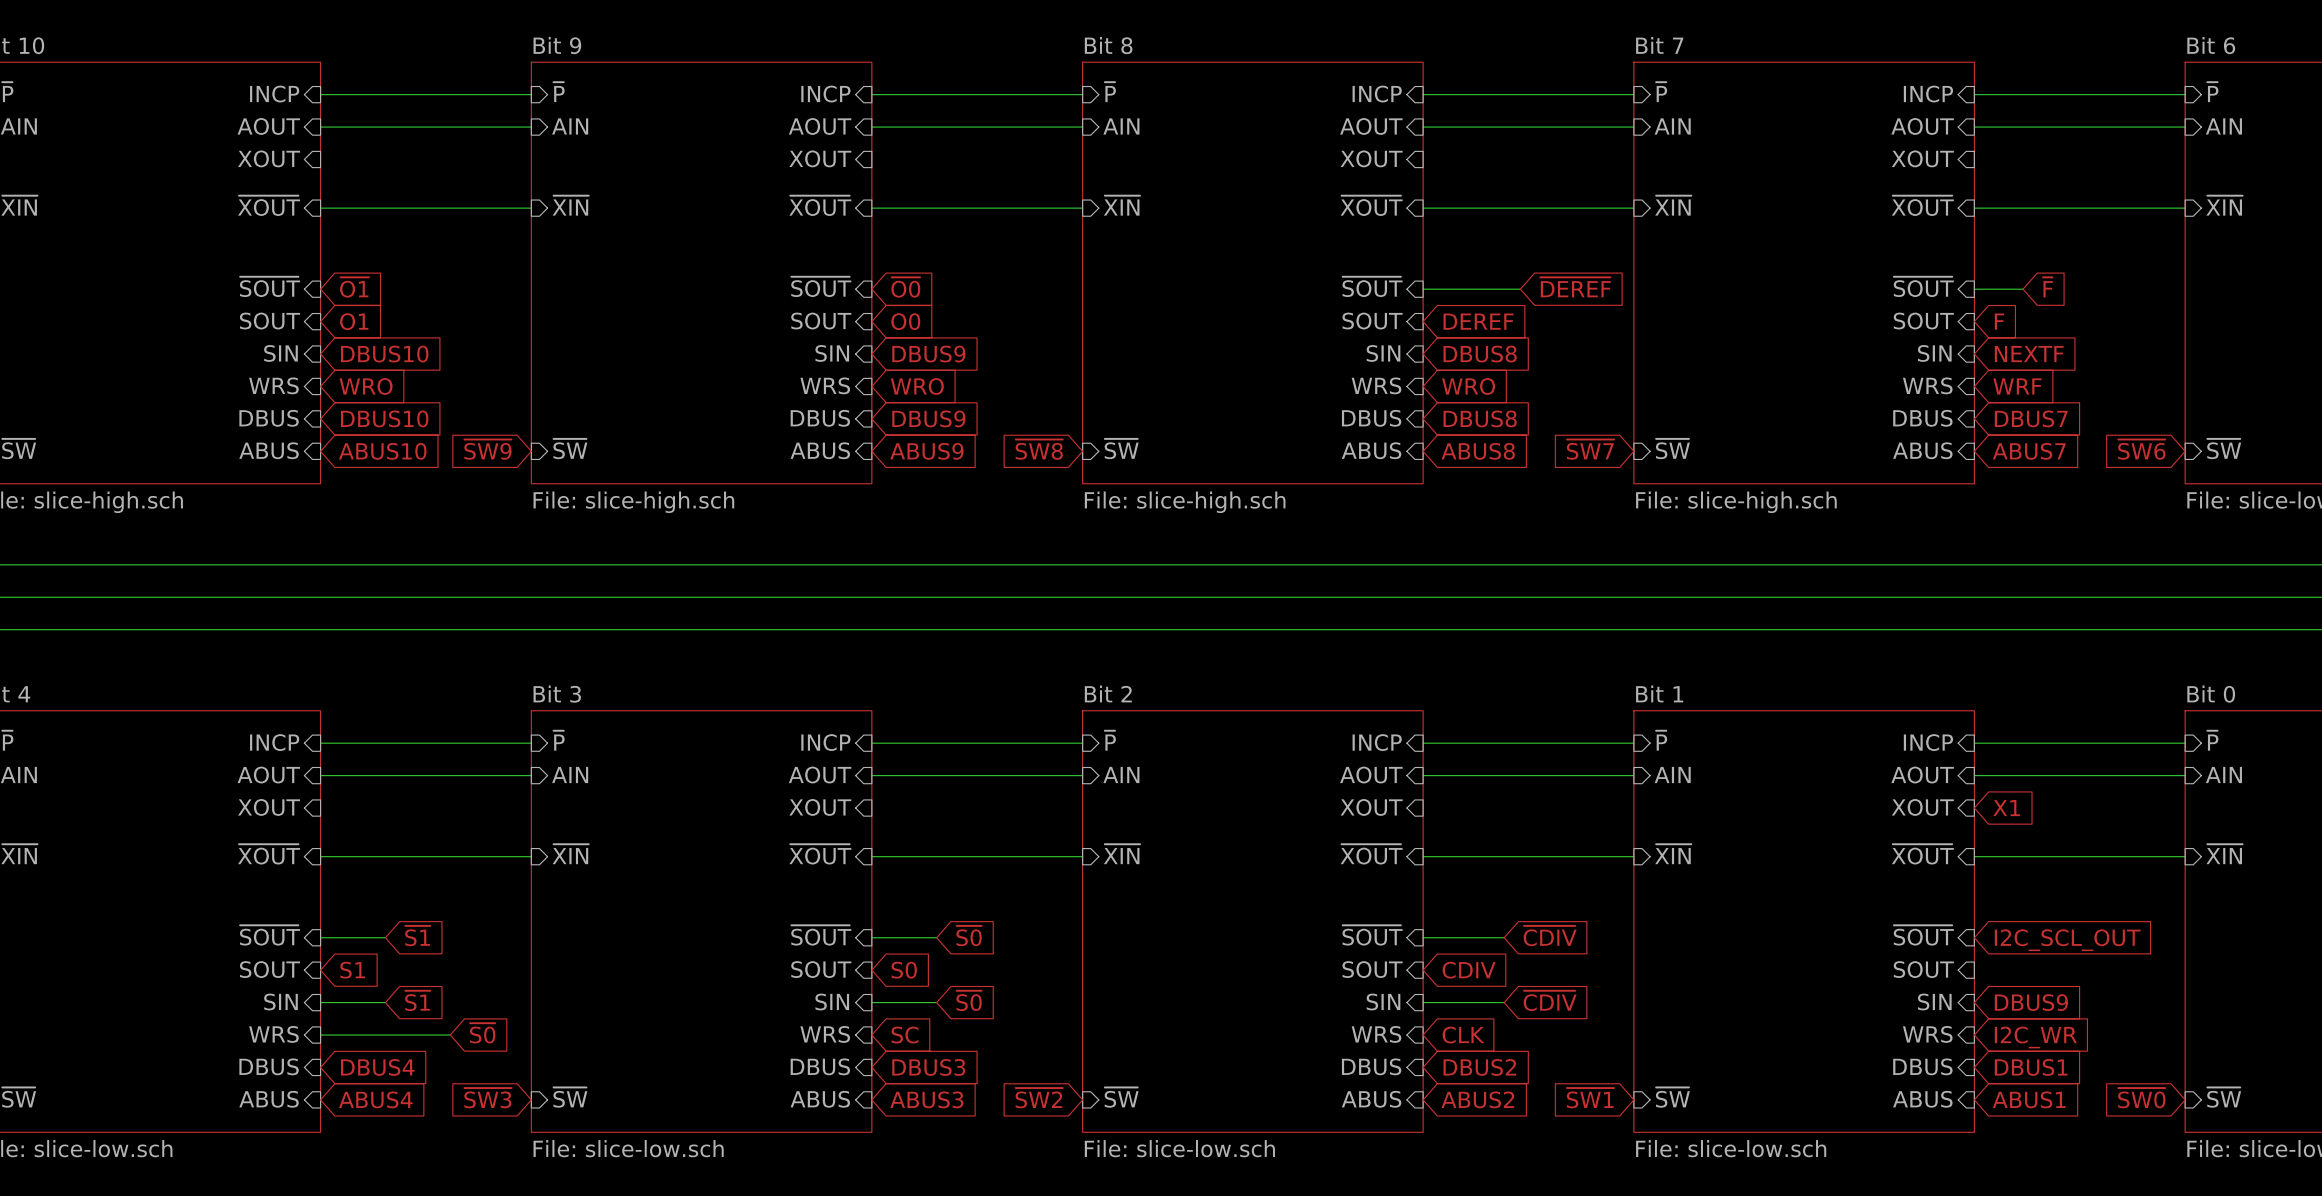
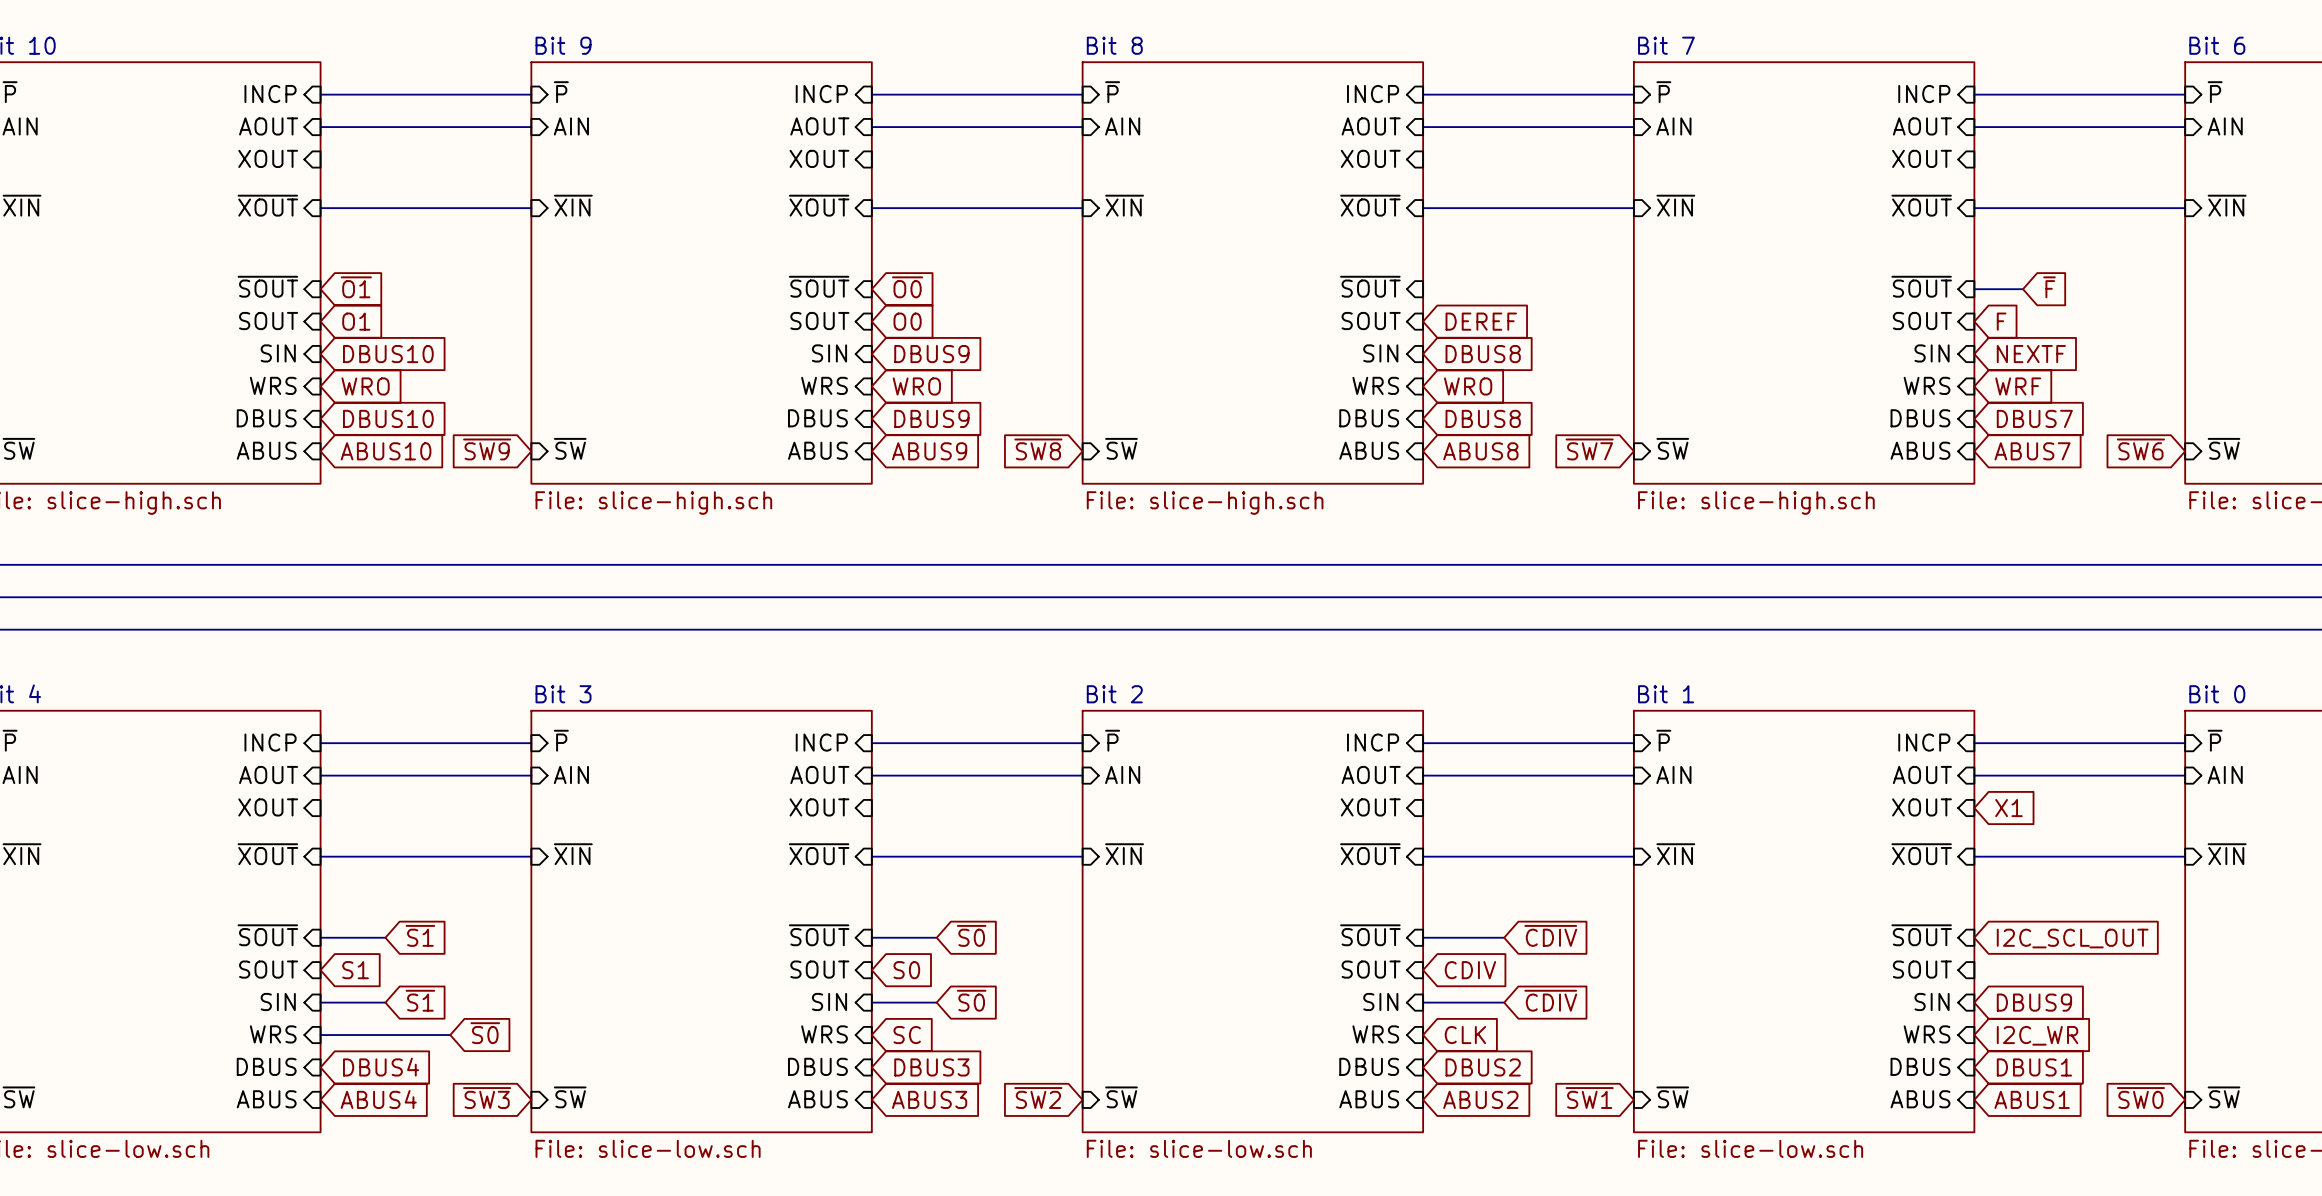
global label: ~{DEREF} (1575, 287) -> none
wire: (1423, 289) (1520, 289) -> none

